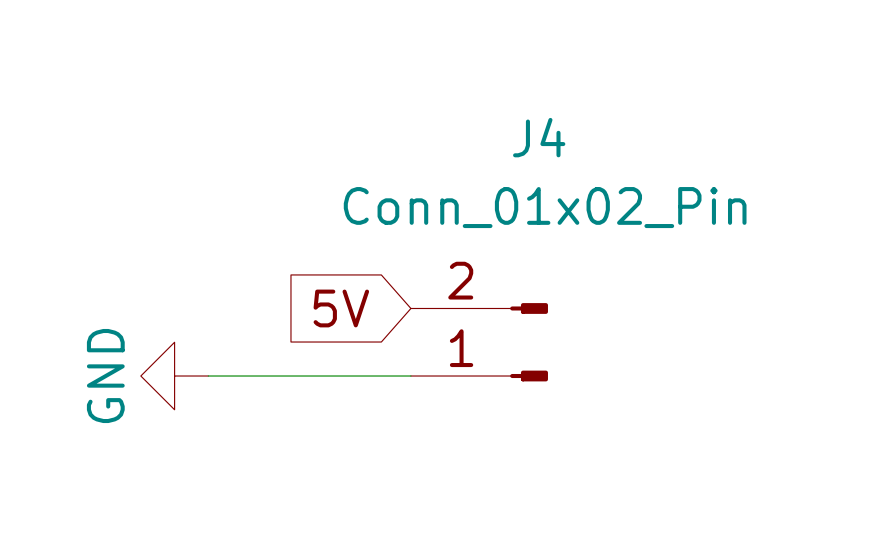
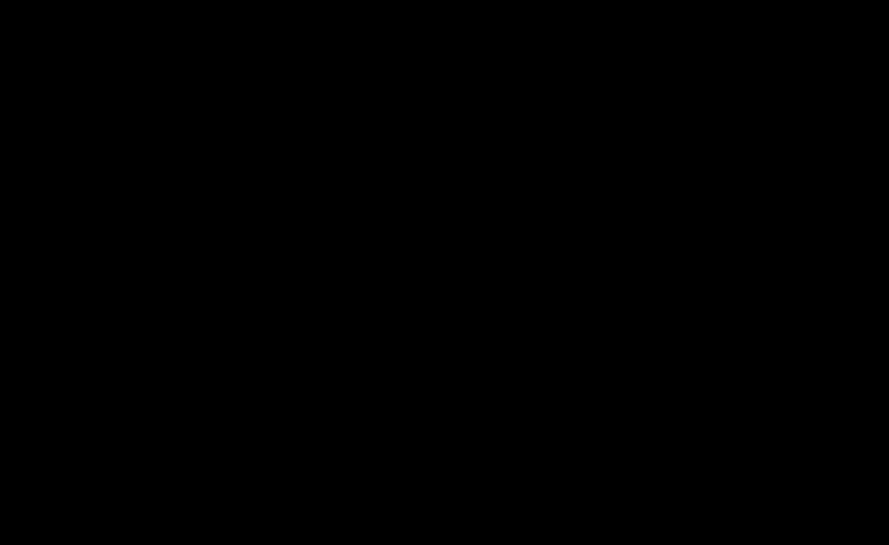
global label: 5V (341, 308) -> none
J4: Conn_01x02_Pin (479, 342) -> none
power symbol: GND (174, 376) -> none
wire: (208, 376) (410, 376) -> none

